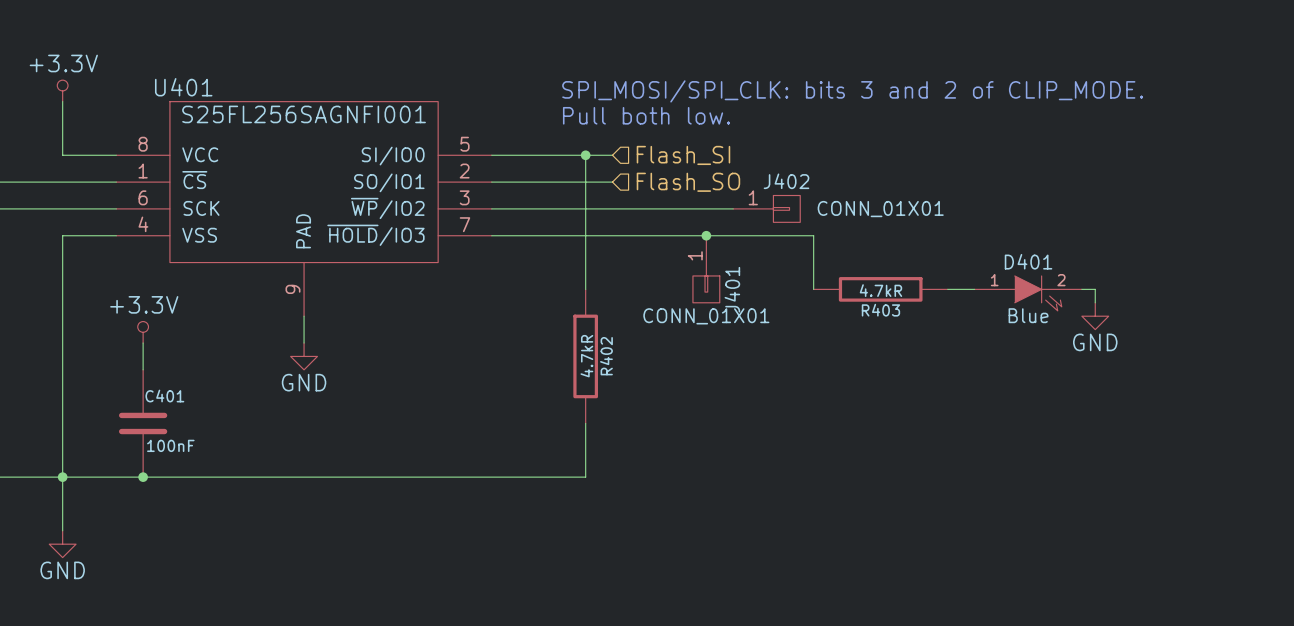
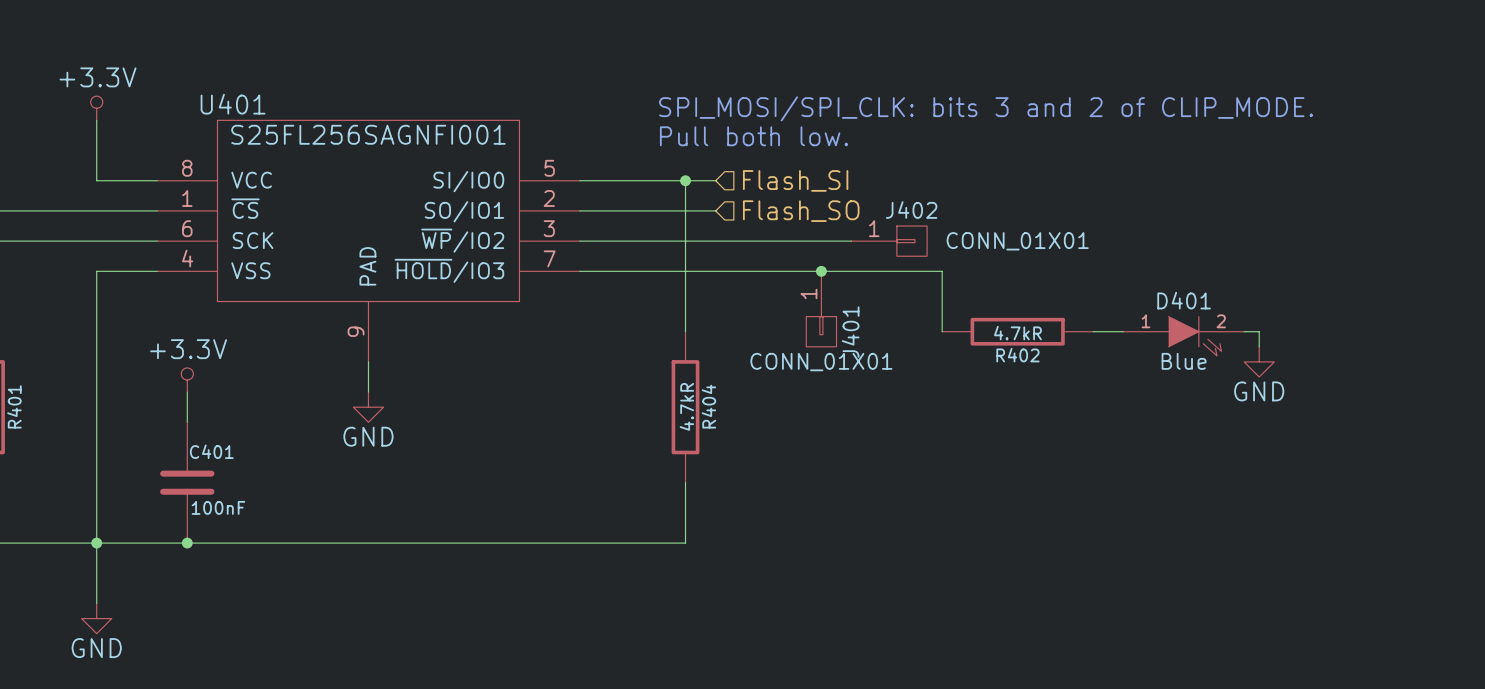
R403 name: R403 (880, 310) -> R402 (1017, 355)
R402 name: R402 (606, 356) -> R404 (708, 406)

